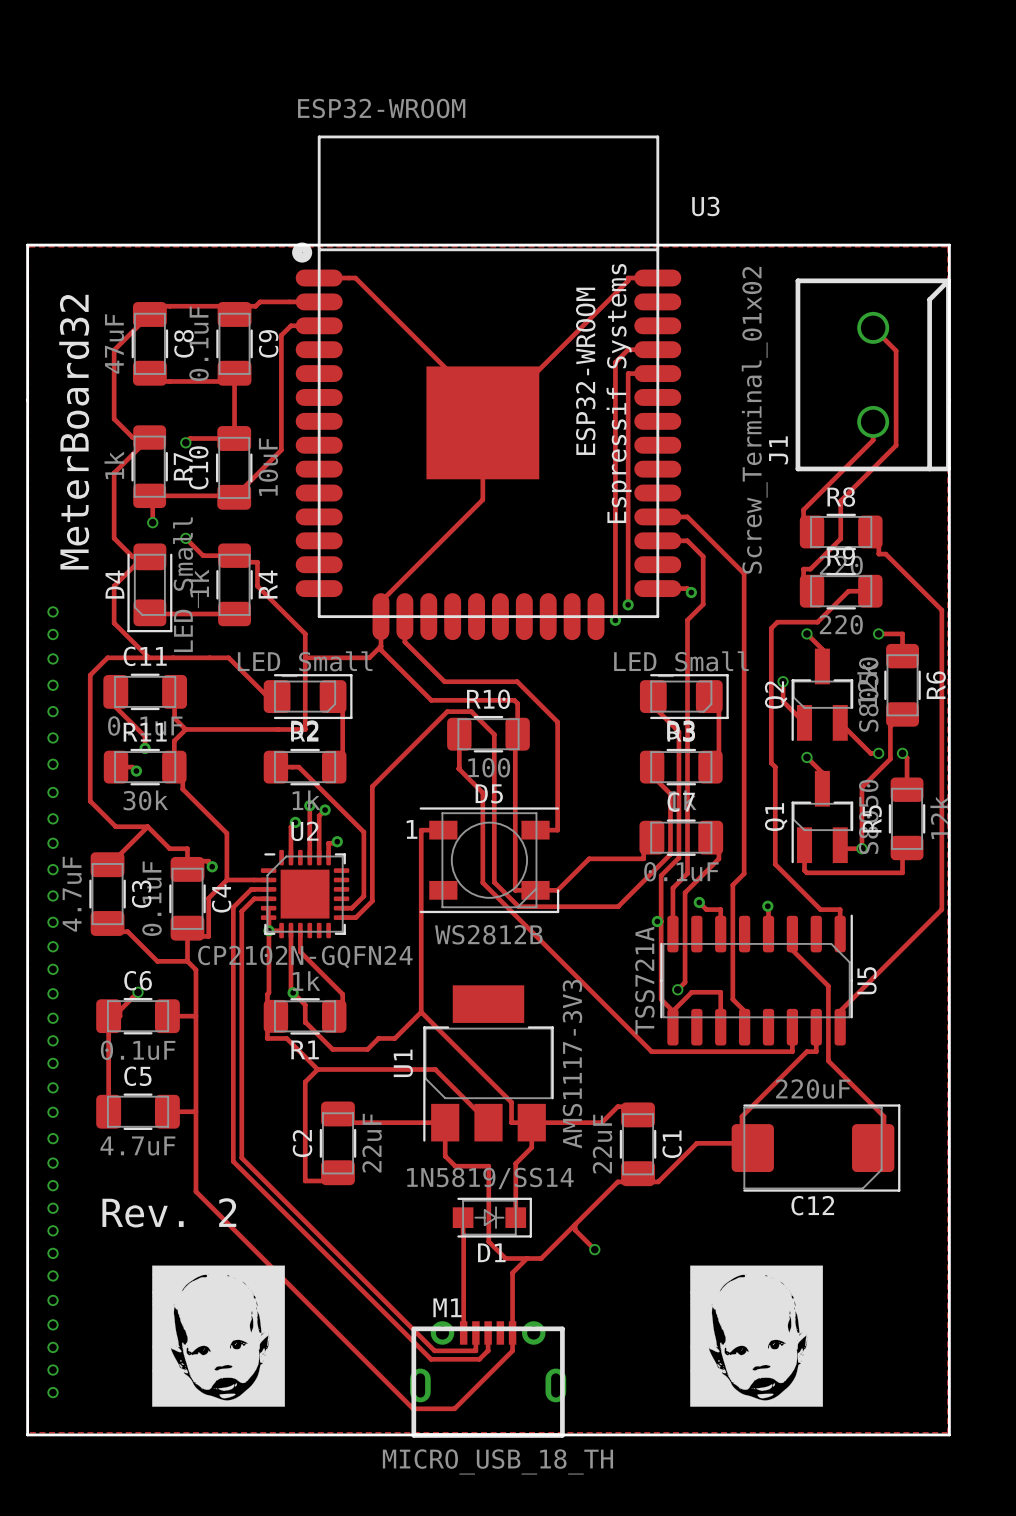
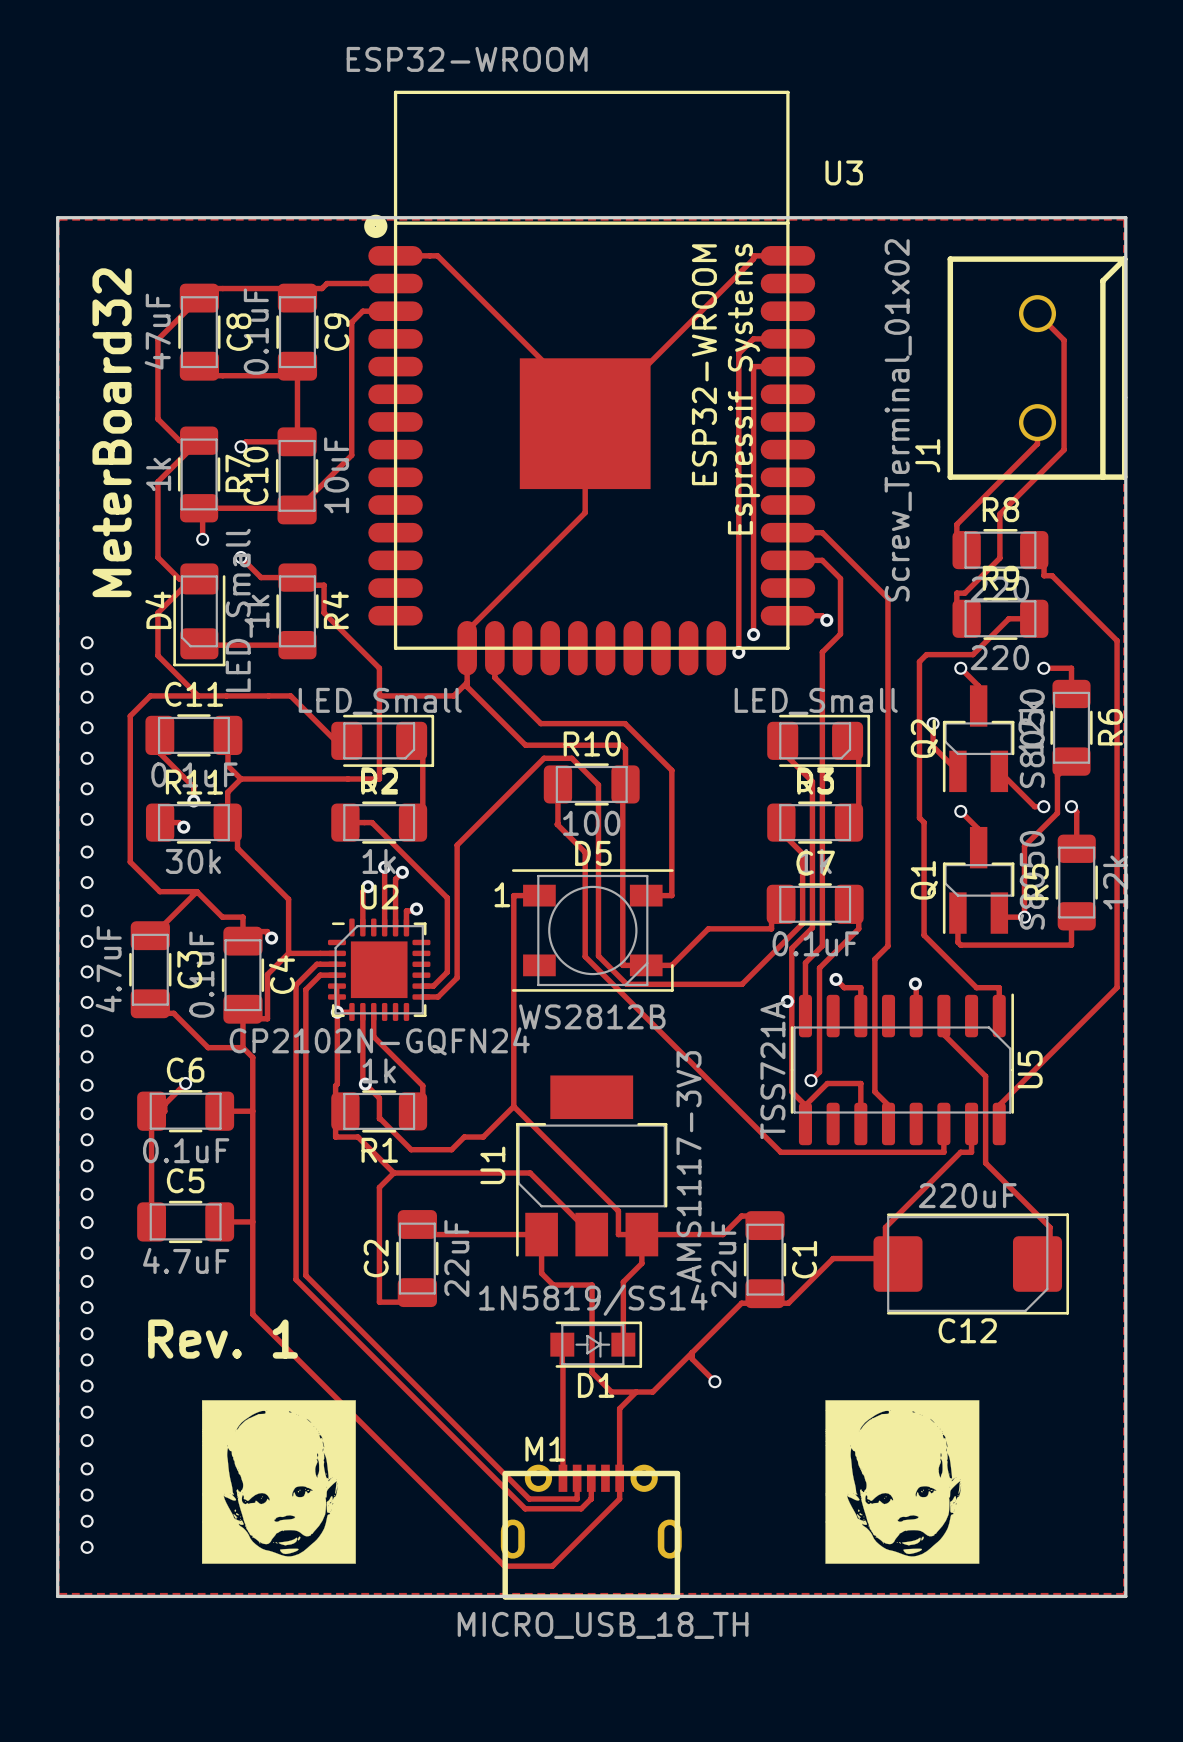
text: Rev. 2 (169, 1212) -> Rev. 1 (223, 1339)

